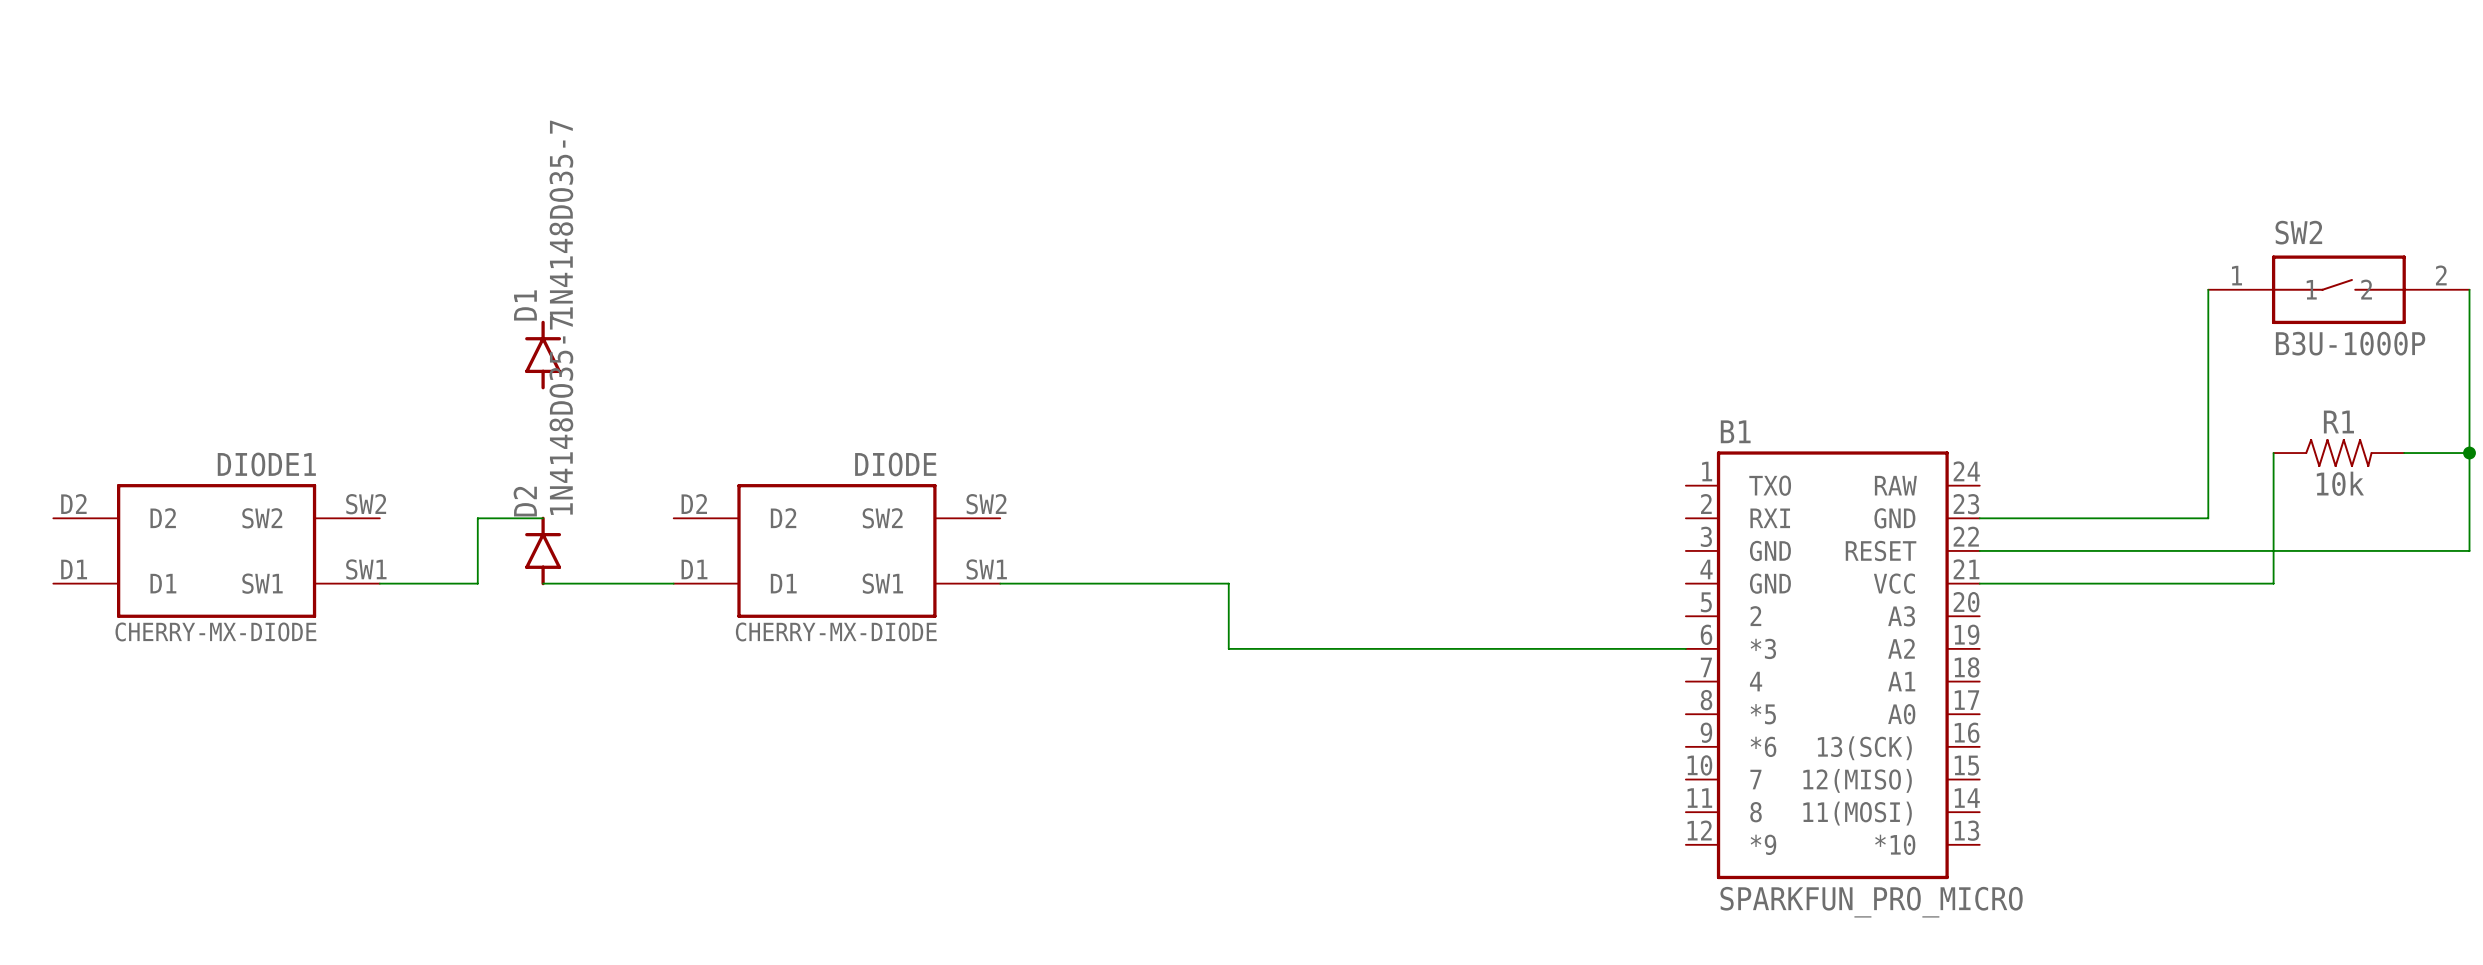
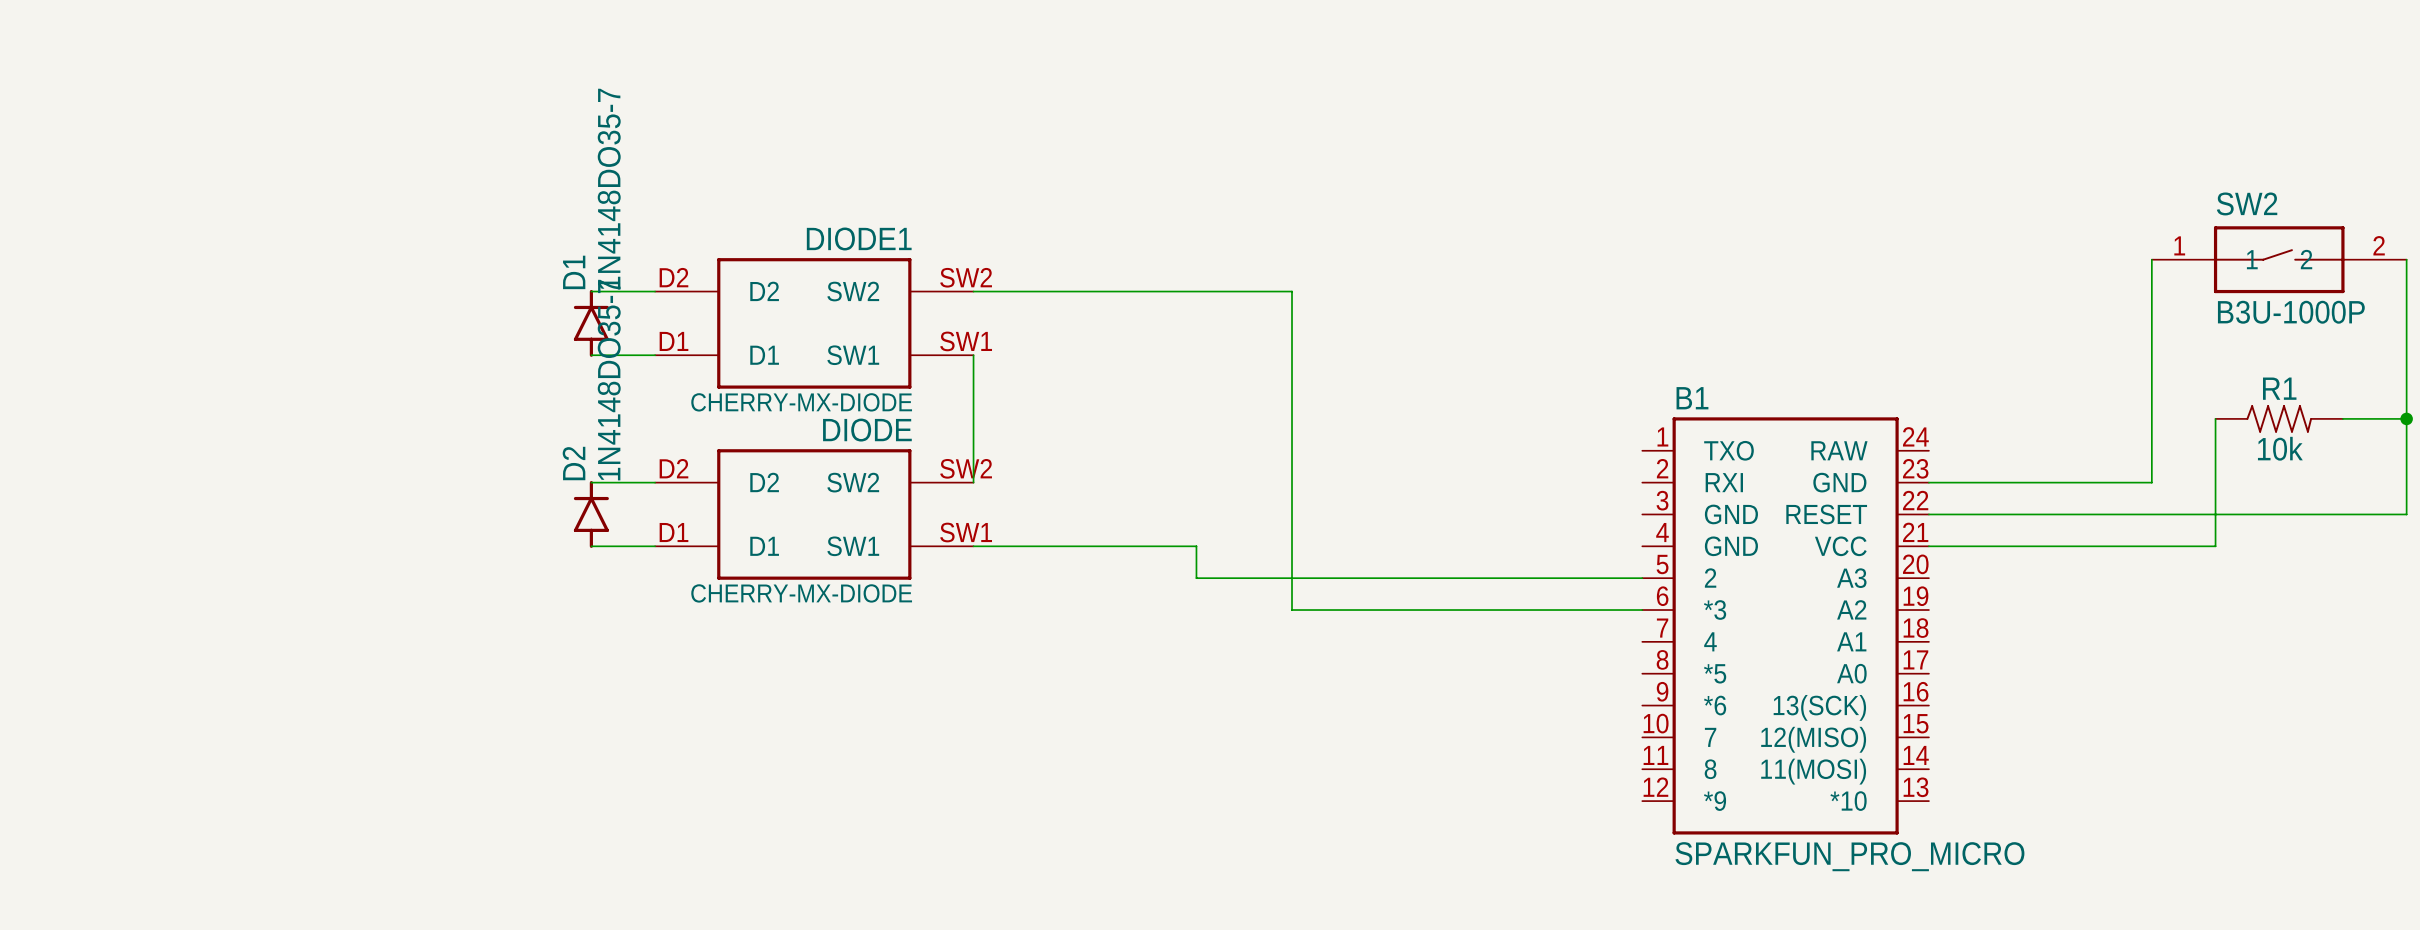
wire: none -> (591, 291) (655, 291)
wire: none -> (973, 291) (1292, 291) (1292, 610)
D1 position: (543, 355) -> (591, 323)
wire: none -> (591, 355) (655, 355)
wire: none -> (973, 355) (973, 482)
wire: (543, 518) (477, 518) (477, 583) (379, 583) -> none
DIODE1 position: (216, 550) -> (814, 323)
D2 position: (543, 550) -> (591, 514)
wire: (543, 583) (608, 583) -> (591, 482) (655, 482)
wire: (1228, 616) (1228, 648) (1326, 648) -> (1196, 578) (1642, 578)

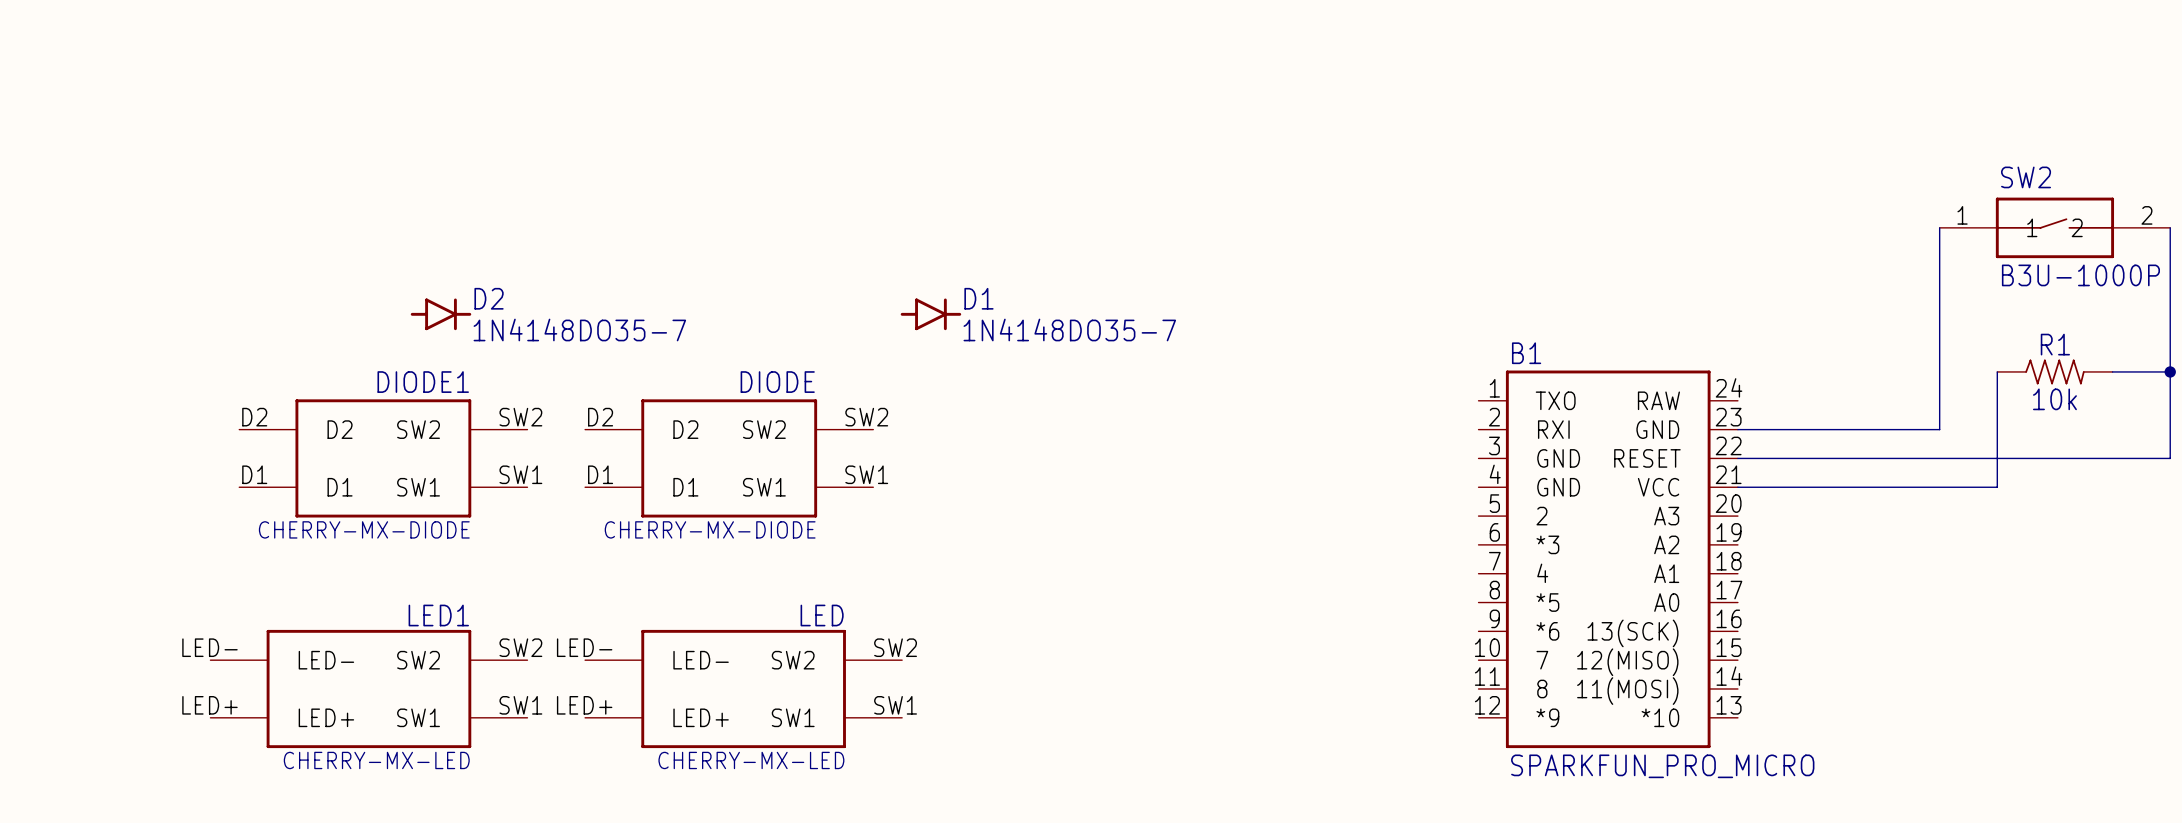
wire: (591, 291) (655, 291) -> none
wire: (973, 291) (1292, 291) (1292, 610) (1642, 610) -> none
D1 rotation: 0° (591, 323) -> 90° clockwise (930, 314)
D1 position: (591, 323) -> (930, 314)
DIODE1 position: (814, 323) -> (383, 458)
wire: (591, 355) (655, 355) -> none
wire: (973, 355) (973, 482) -> none
wire: (591, 482) (655, 482) -> none
D2 rotation: 0° (591, 514) -> 90° clockwise (441, 314)
D2 position: (591, 514) -> (441, 314)
wire: (591, 546) (655, 546) -> none
wire: (973, 546) (1196, 546) (1196, 578) (1642, 578) -> none
LED1: none -> (368, 688)
LED: none -> (743, 688)

